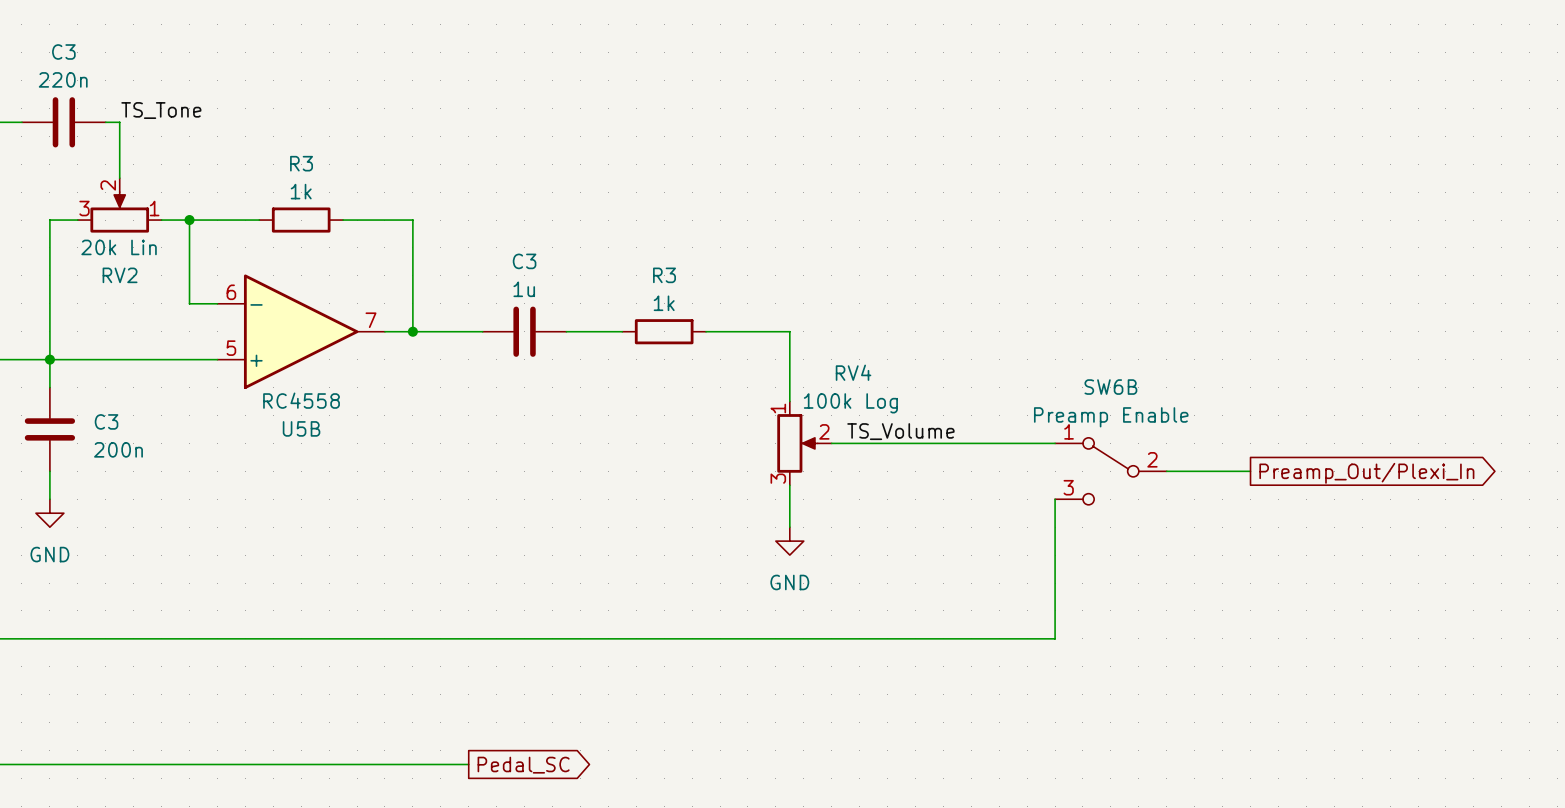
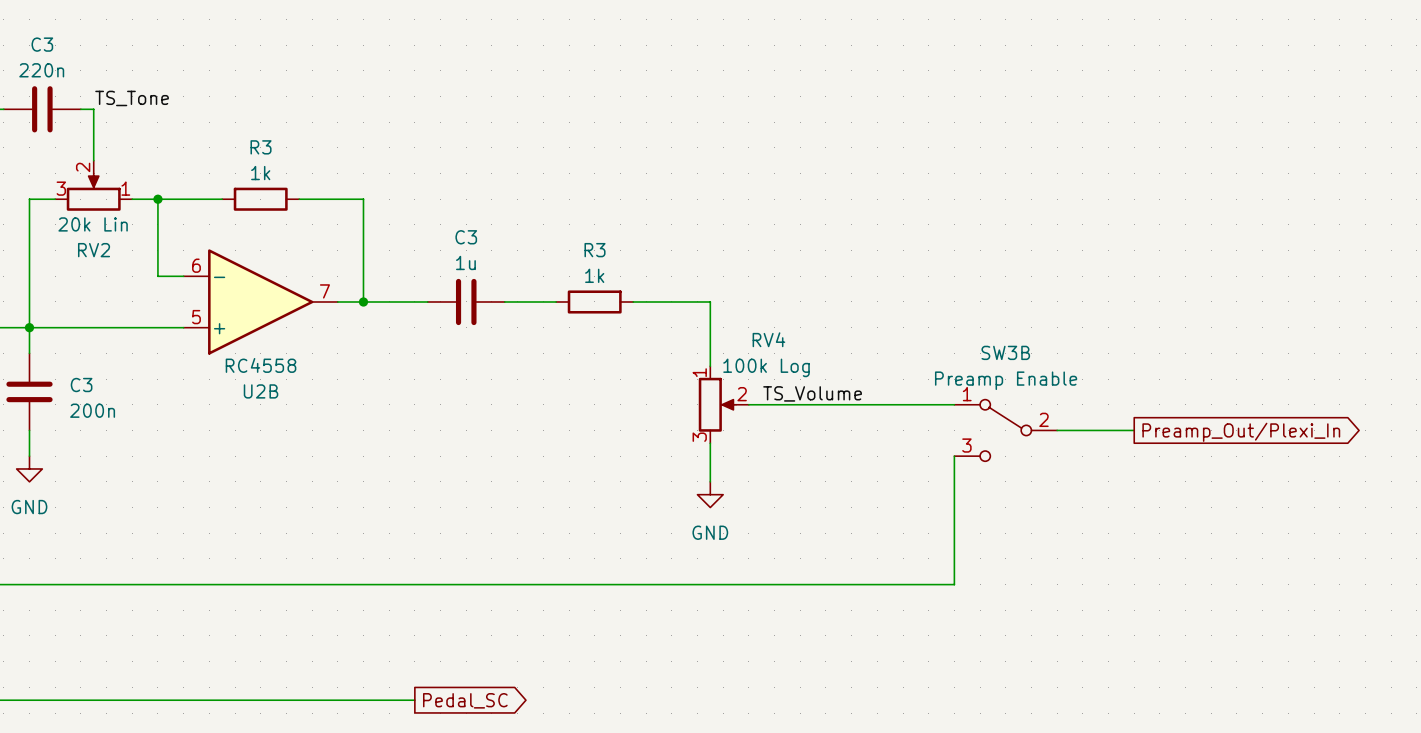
SW6B name: SW6B (1110, 387) -> SW3B (1005, 352)
U5B name: U5B (301, 428) -> U2B (261, 391)

